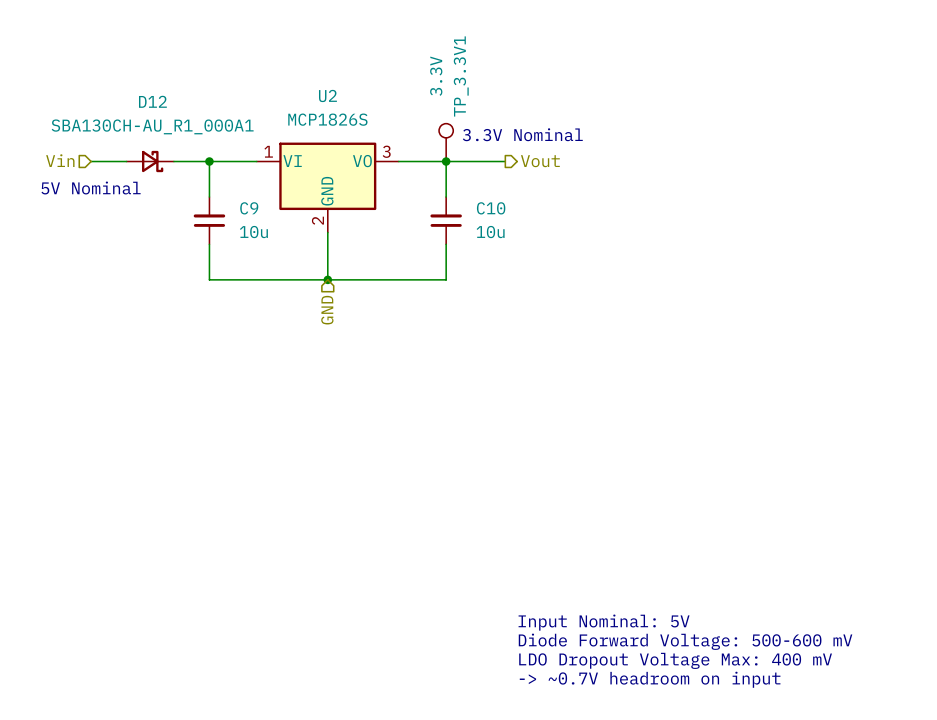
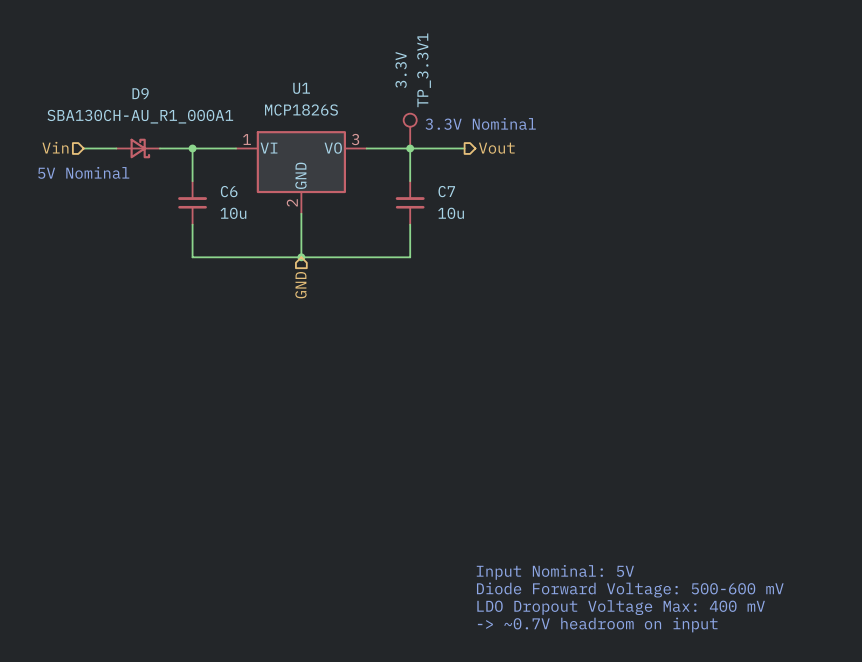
U2 name: U2 (327, 95) -> U1 (301, 88)
D12 name: D12 (152, 101) -> D9 (140, 93)
C9 name: C9 (249, 208) -> C6 (229, 191)
C10 name: C10 (491, 208) -> C7 (446, 191)

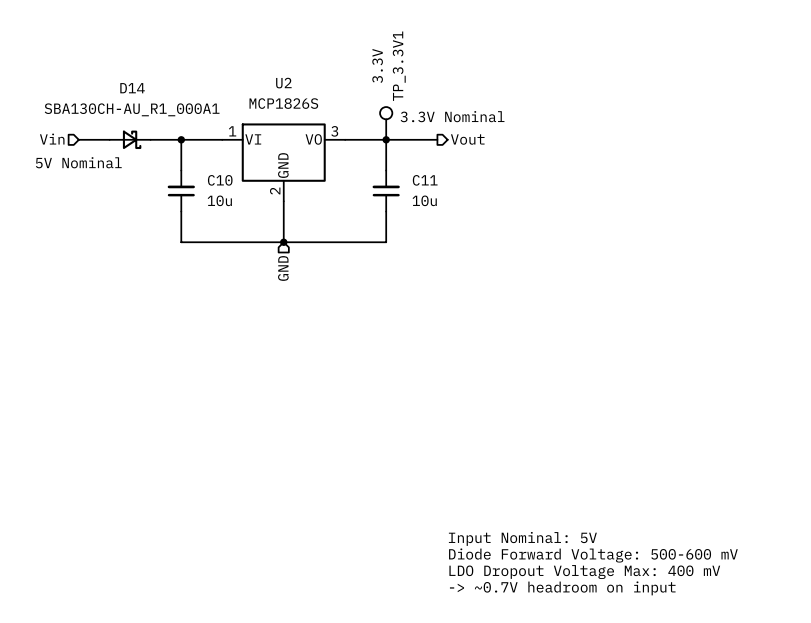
U1 name: U1 (301, 88) -> U2 (283, 83)
D9 name: D9 (140, 93) -> D14 (132, 88)
C6 name: C6 (229, 191) -> C10 (220, 180)
C7 name: C7 (446, 191) -> C11 (425, 180)

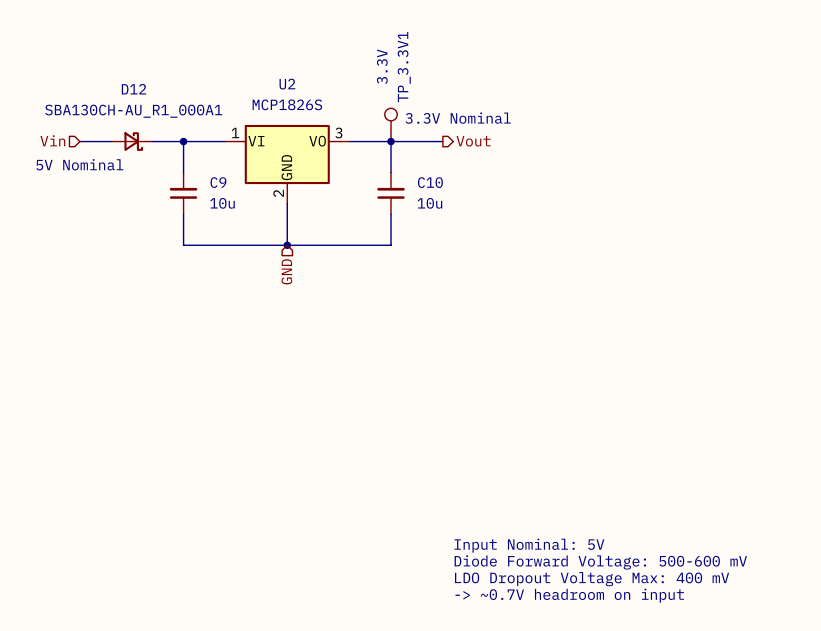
D14 name: D14 (132, 88) -> D12 (134, 89)
C10 name: C10 (220, 180) -> C9 (218, 182)
C11 name: C11 (425, 180) -> C10 (430, 182)

